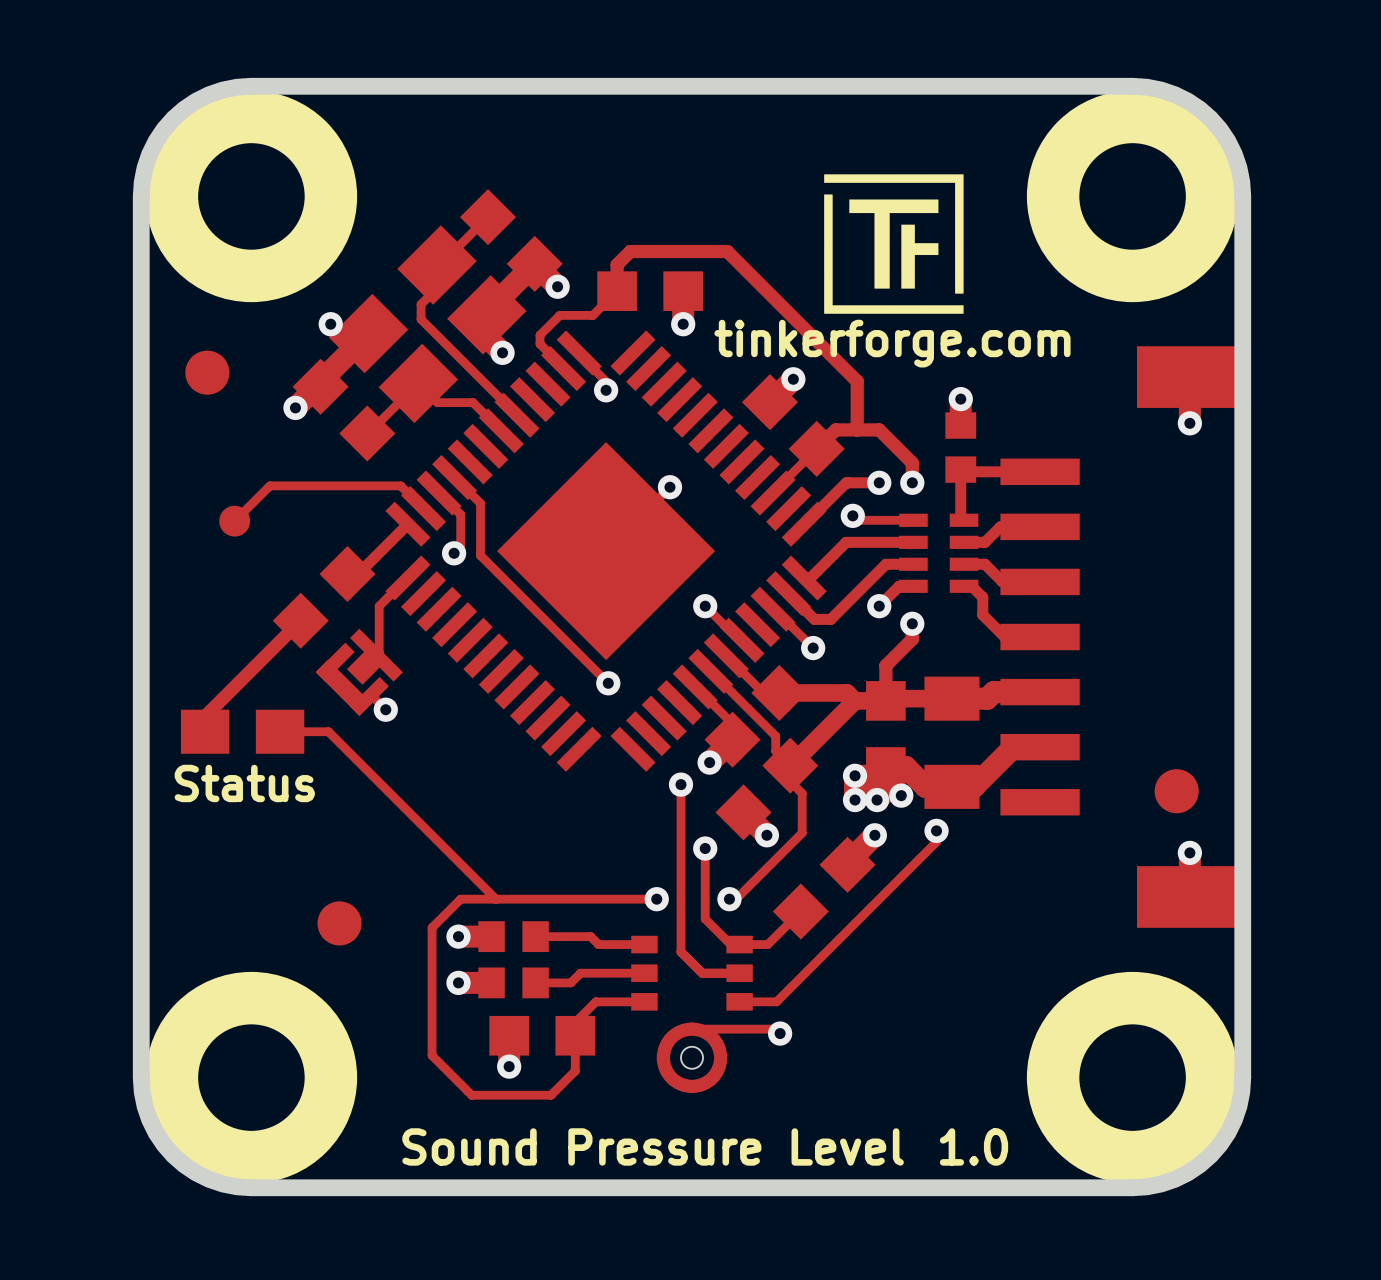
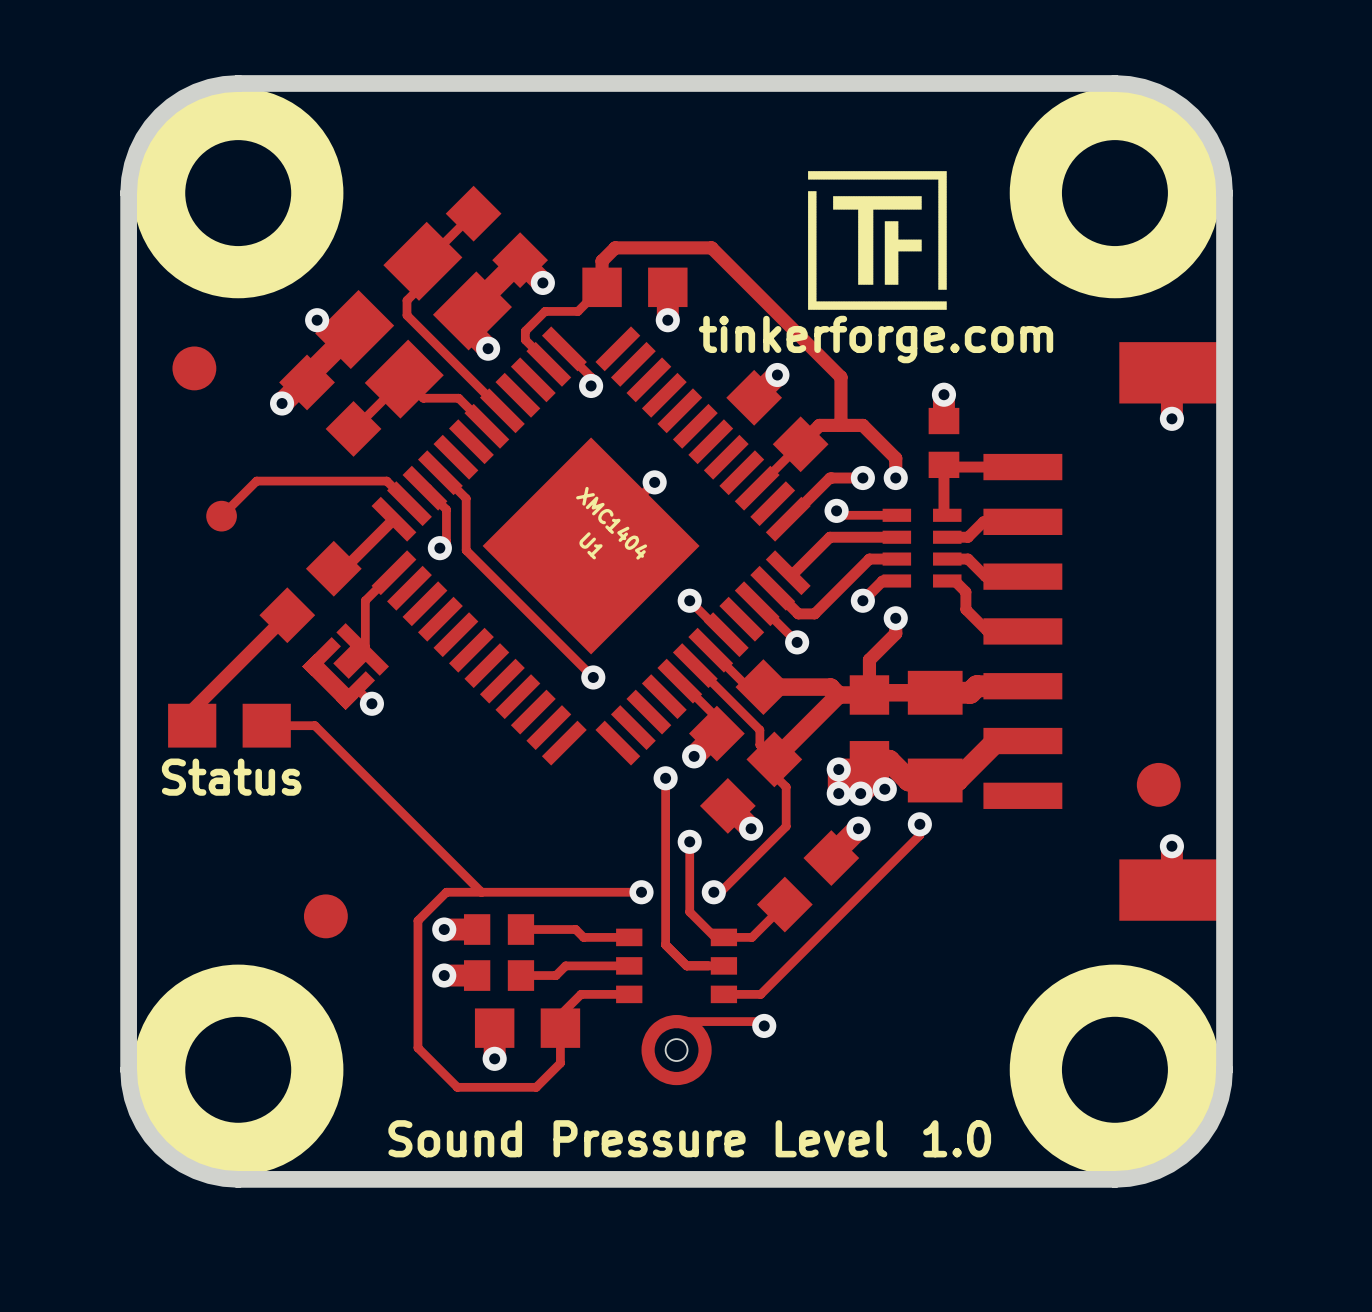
U1 value: none -> XMC1404 (611, 523)
U1 name: none -> U1 (591, 545)

